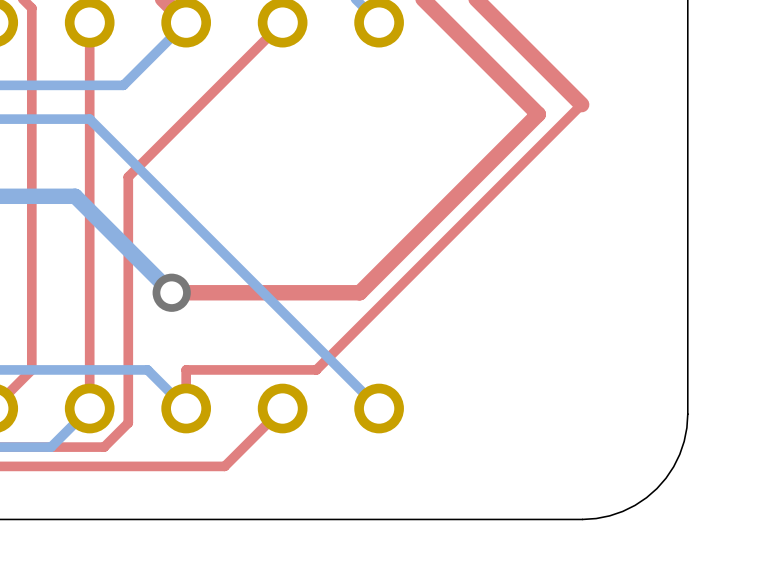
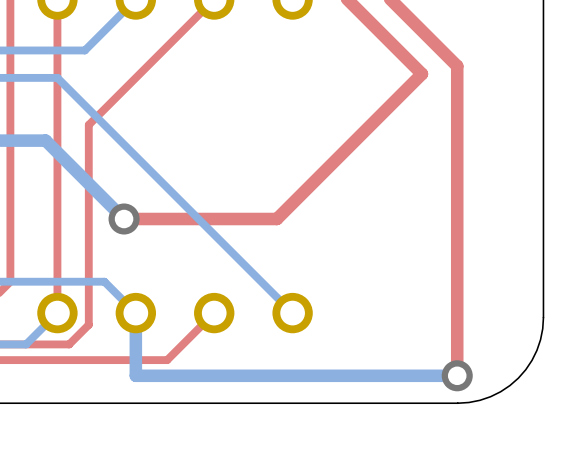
top track: (581, 104) (316, 369) (186, 369) (186, 408) -> (457, 66) (457, 375)
bottom track: none -> (135, 313) (135, 375) (457, 375)
via: none -> (457, 375)

